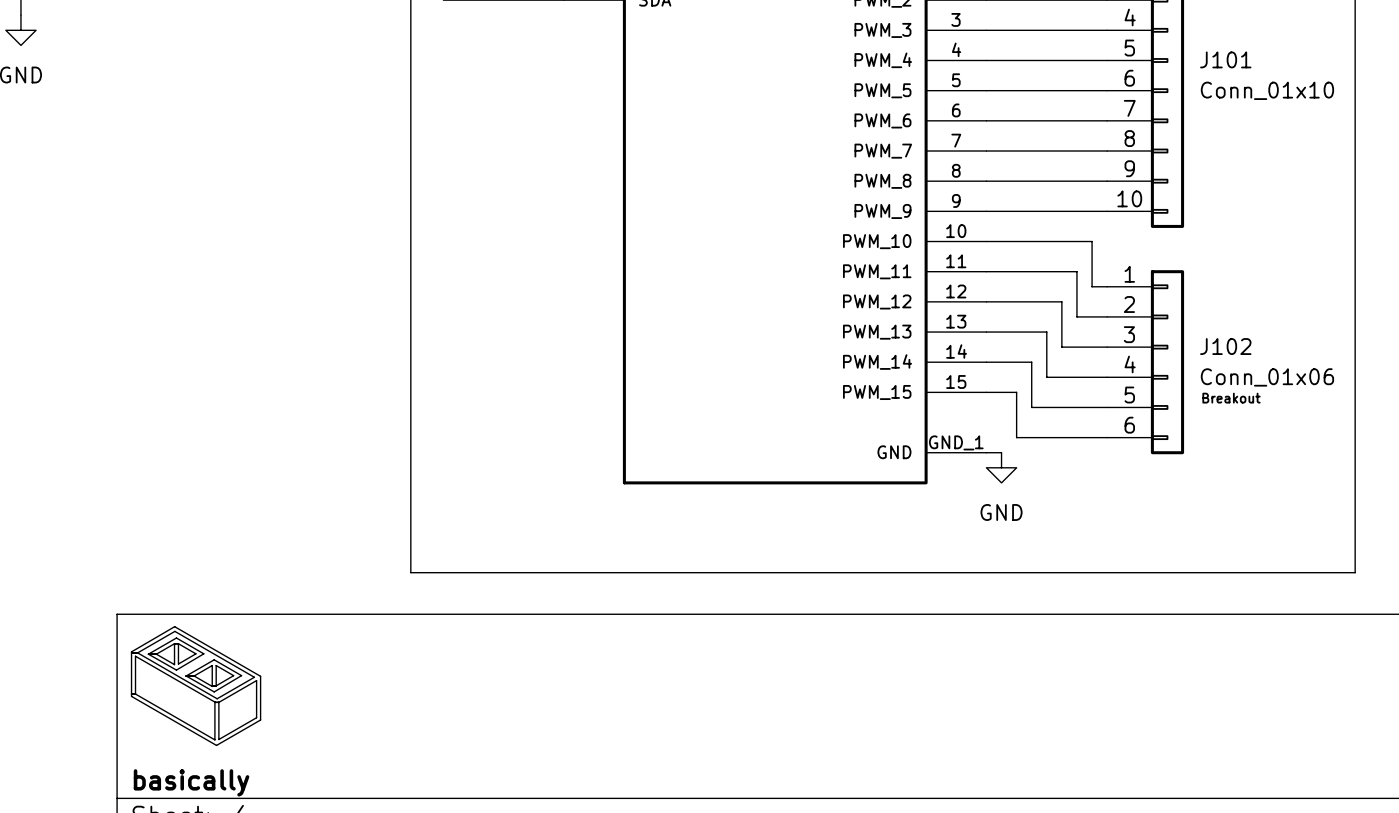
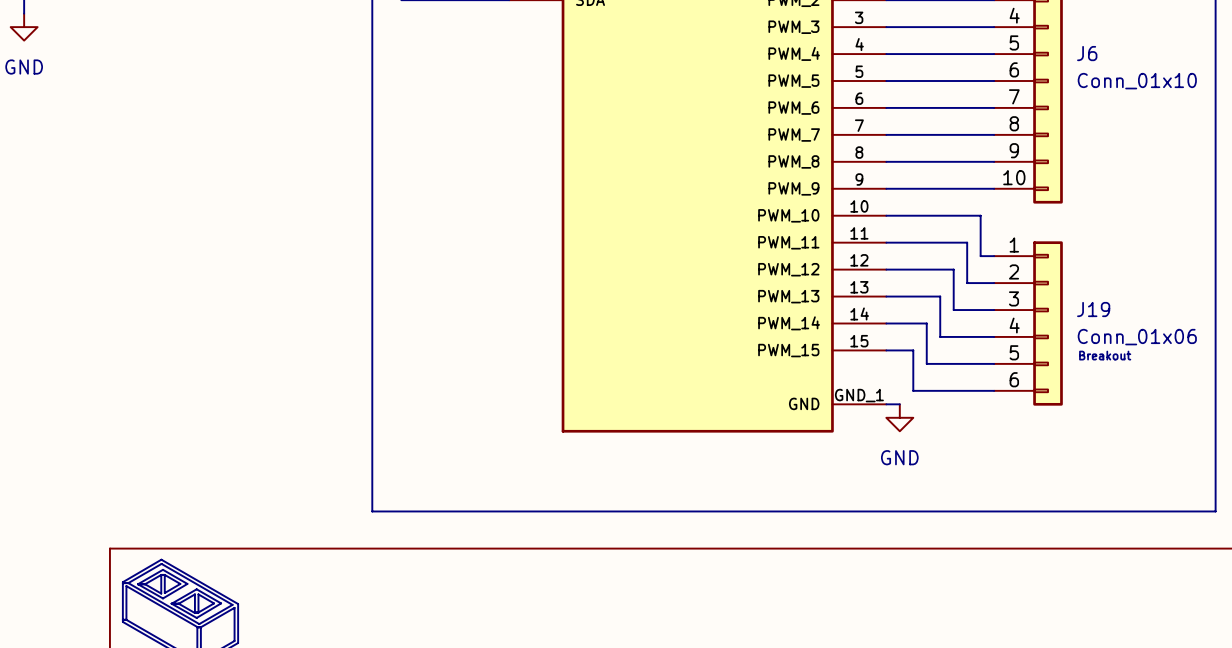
J101 name: J101 (1225, 59) -> J6 (1087, 53)
J102 name: J102 (1225, 346) -> J19 (1093, 309)

